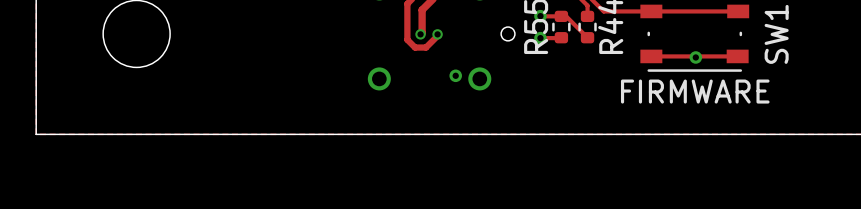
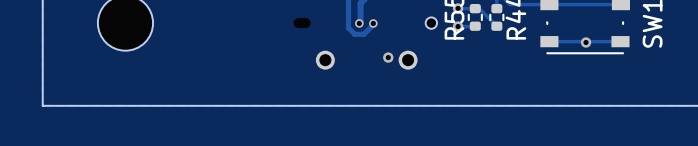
SW1 text: FIRMWARE (695, 91) -> none

